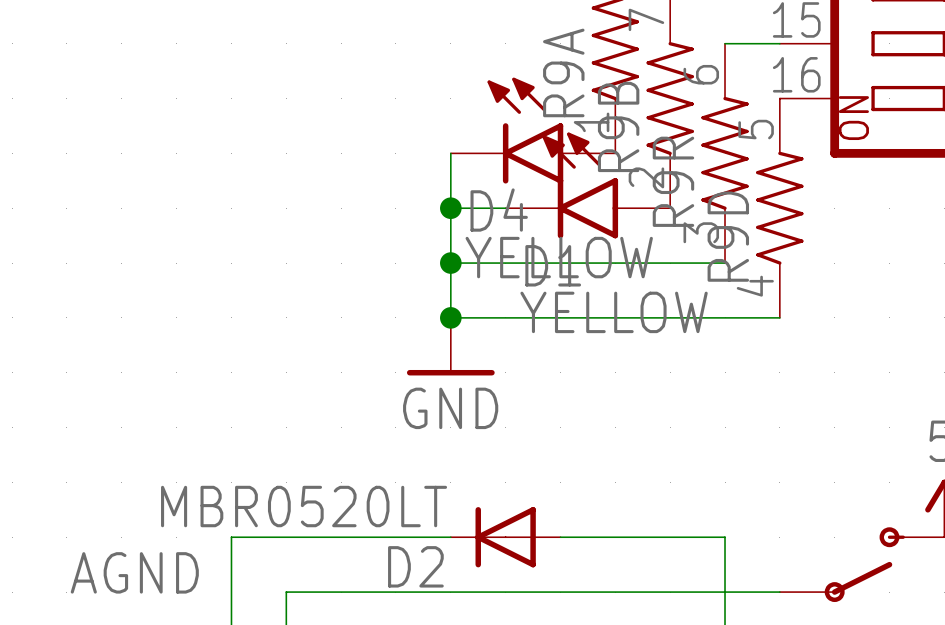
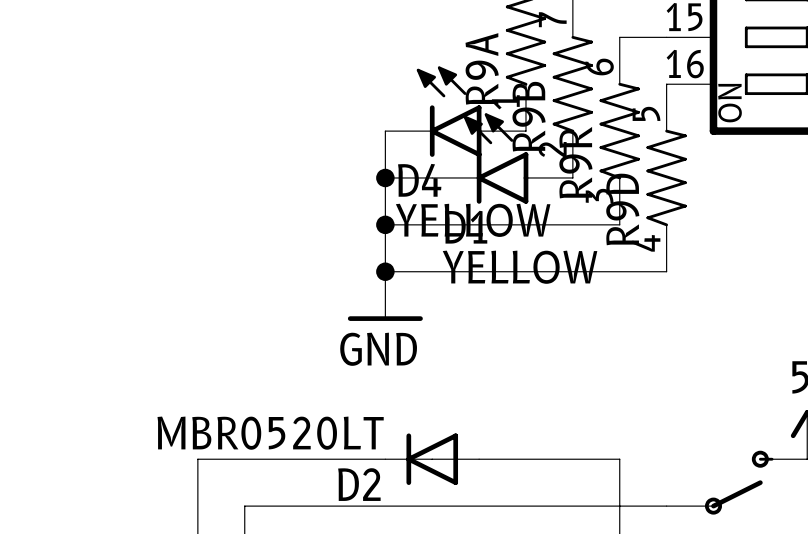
label: AGND (134, 572) -> none

